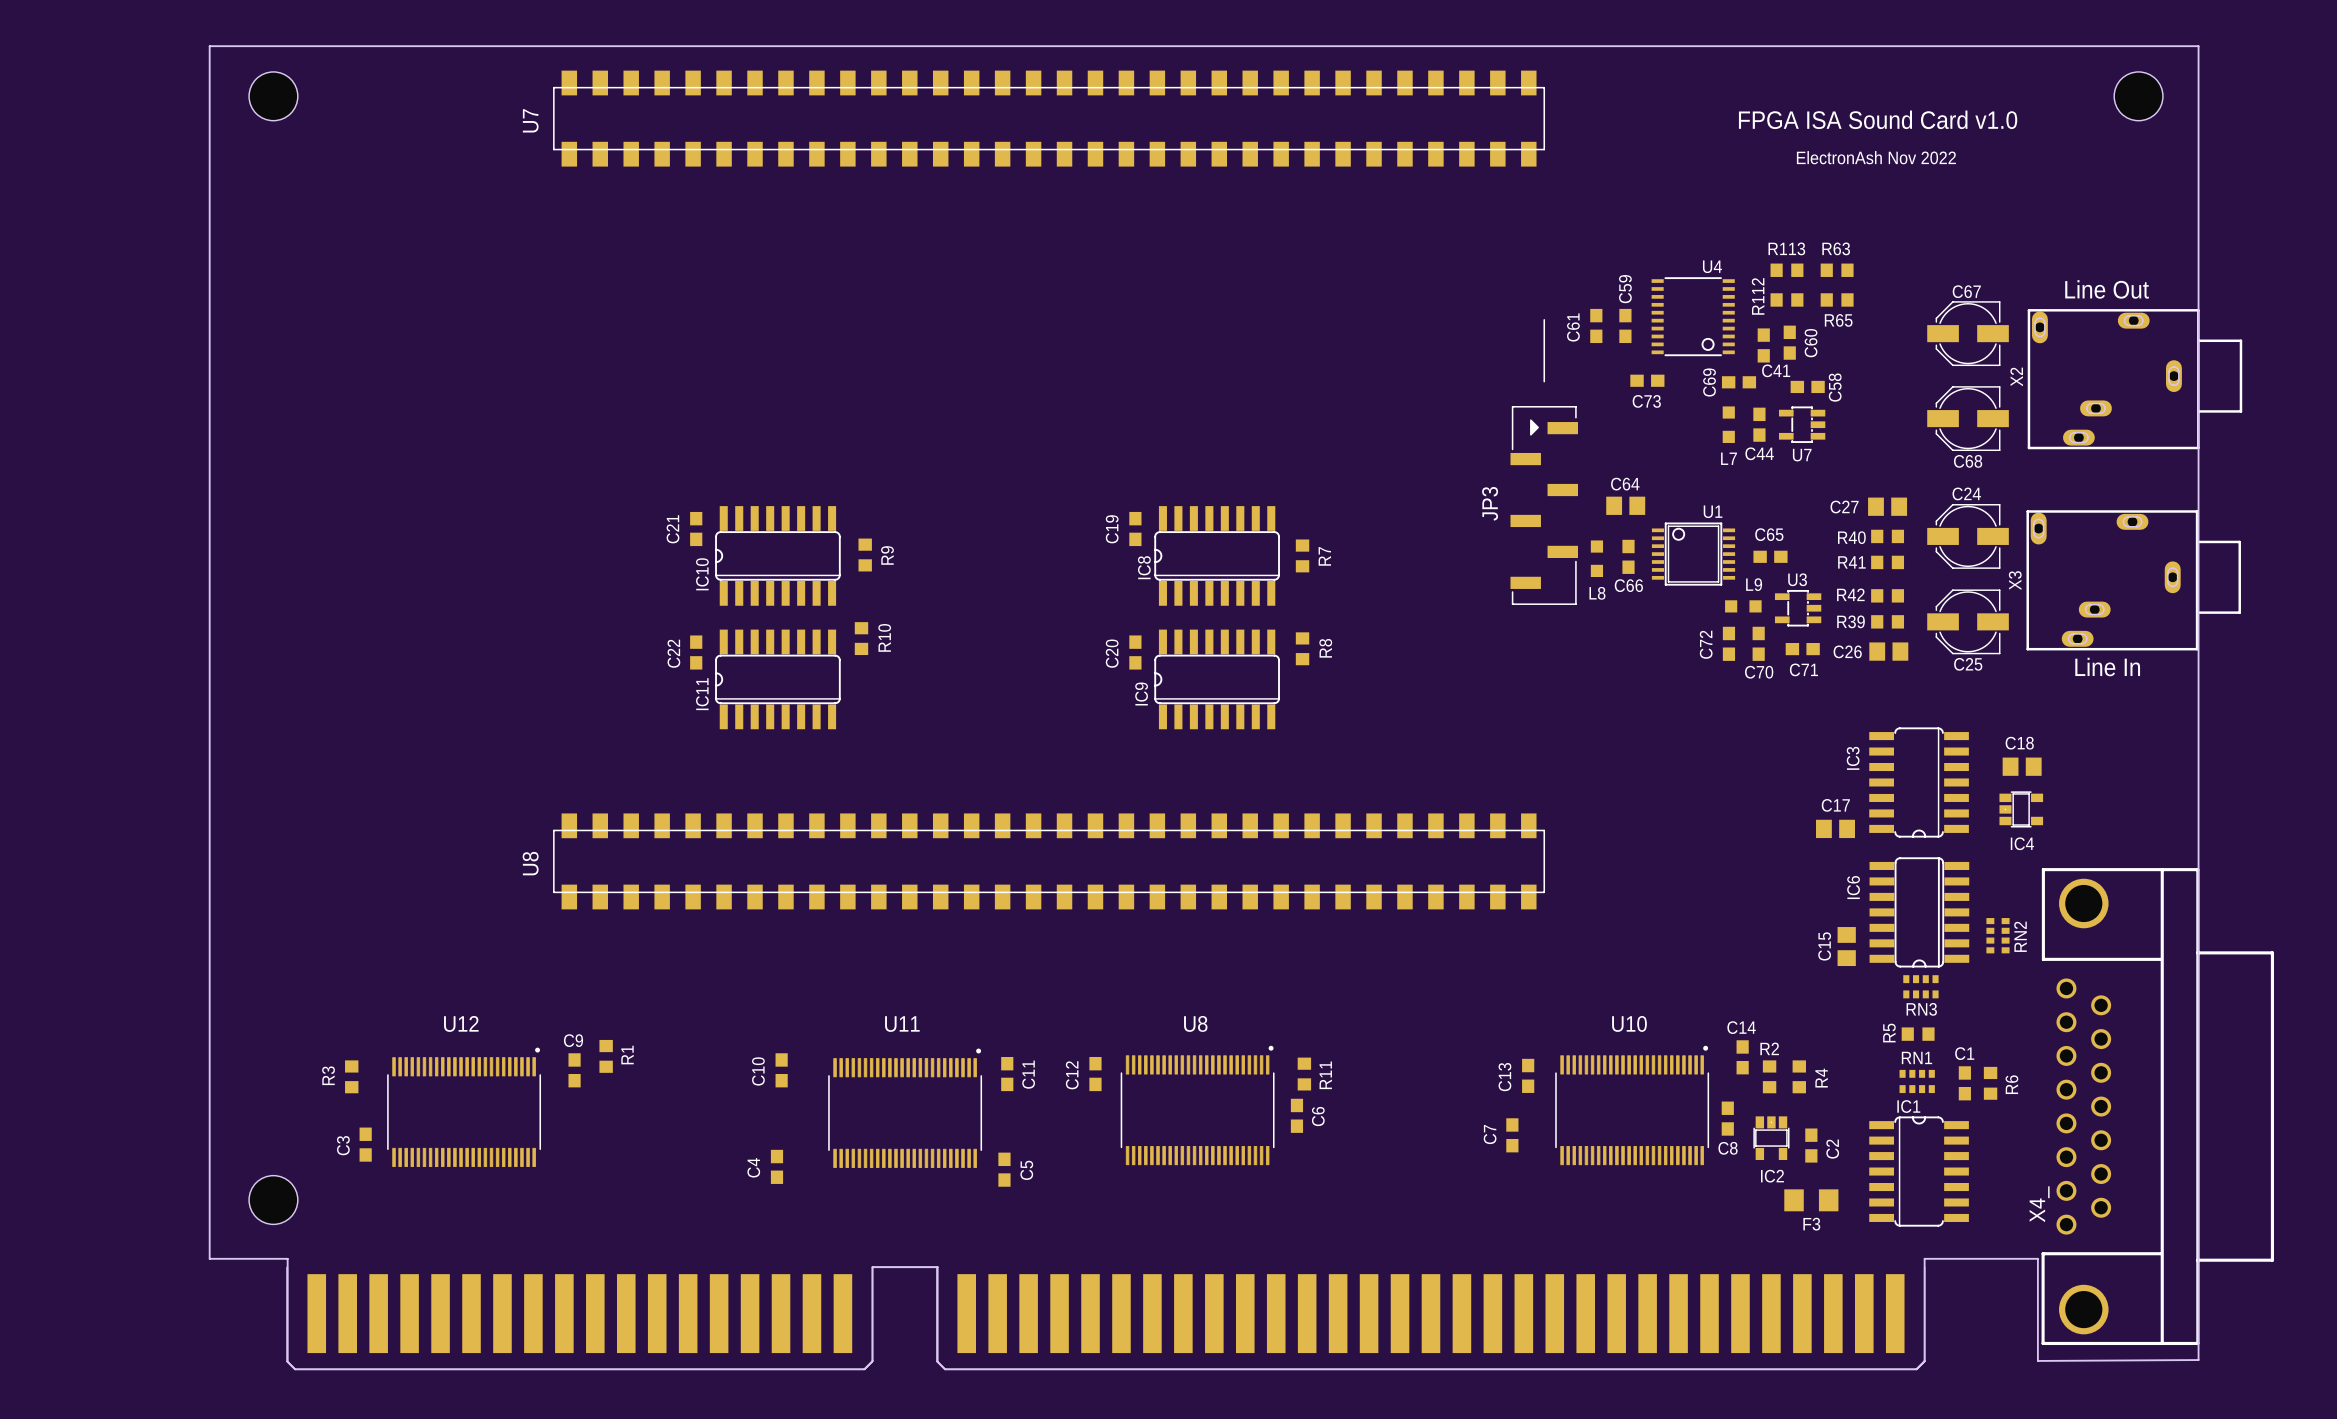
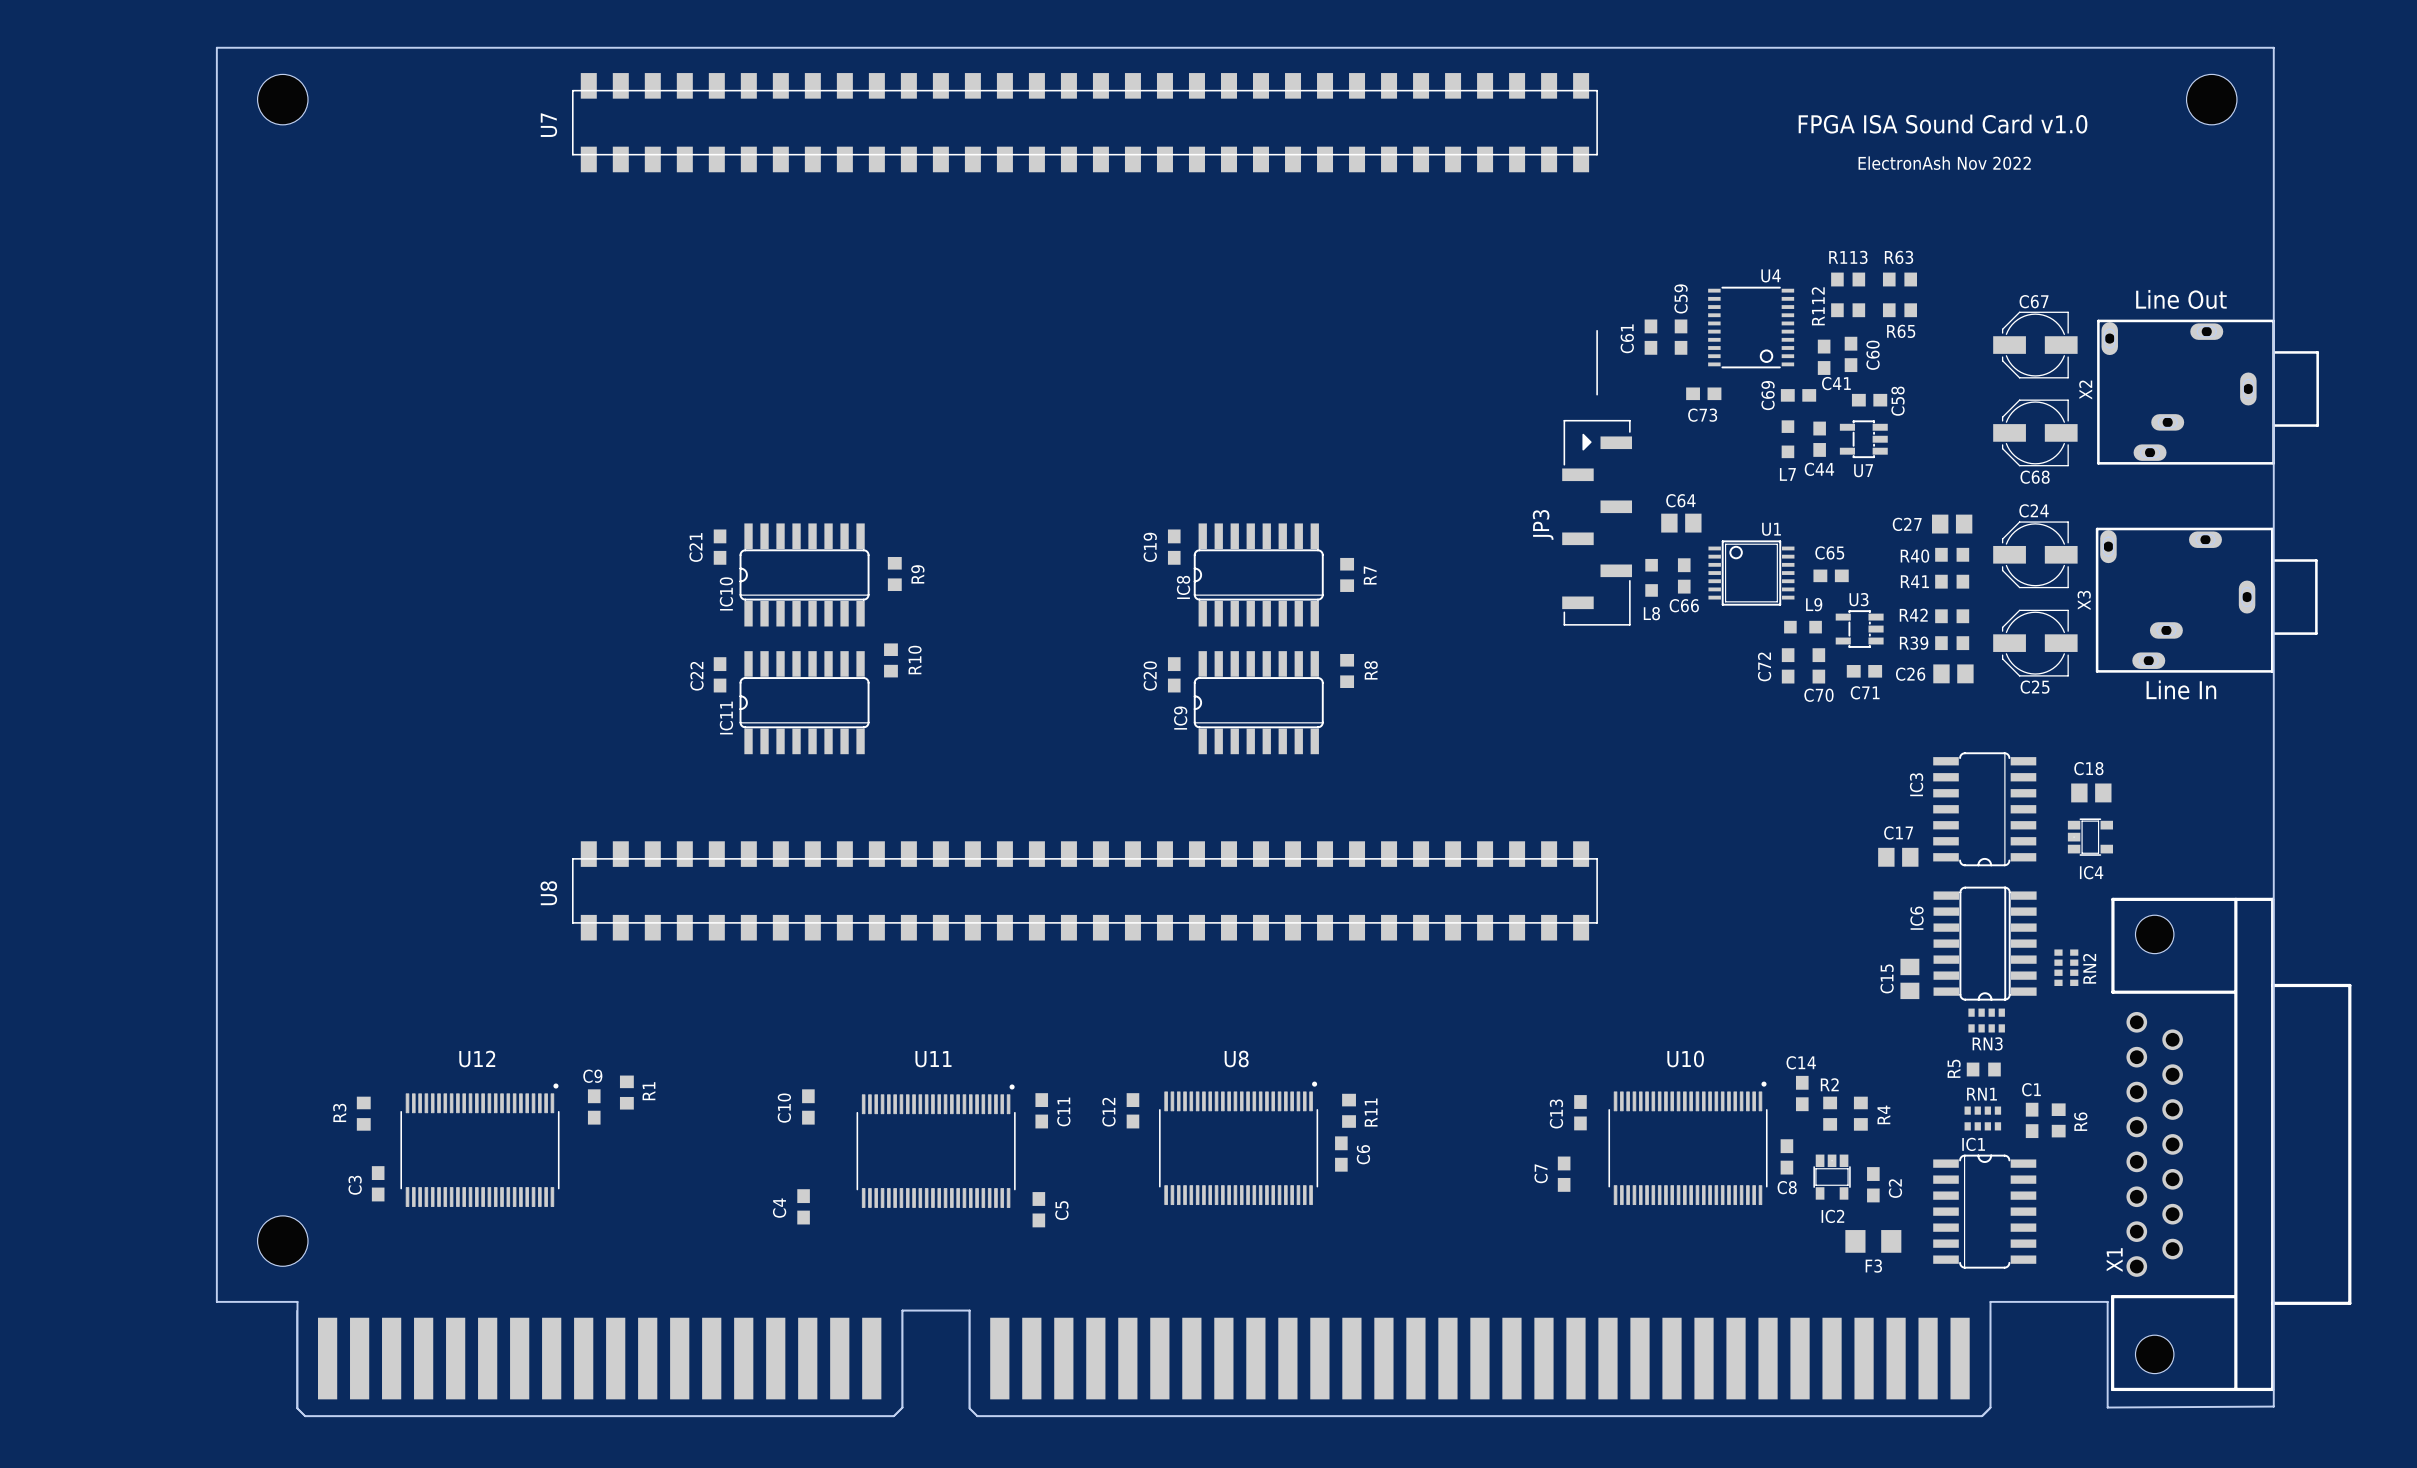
X4_: (2157, 1106) -> none
X1: none -> (2231, 1144)

